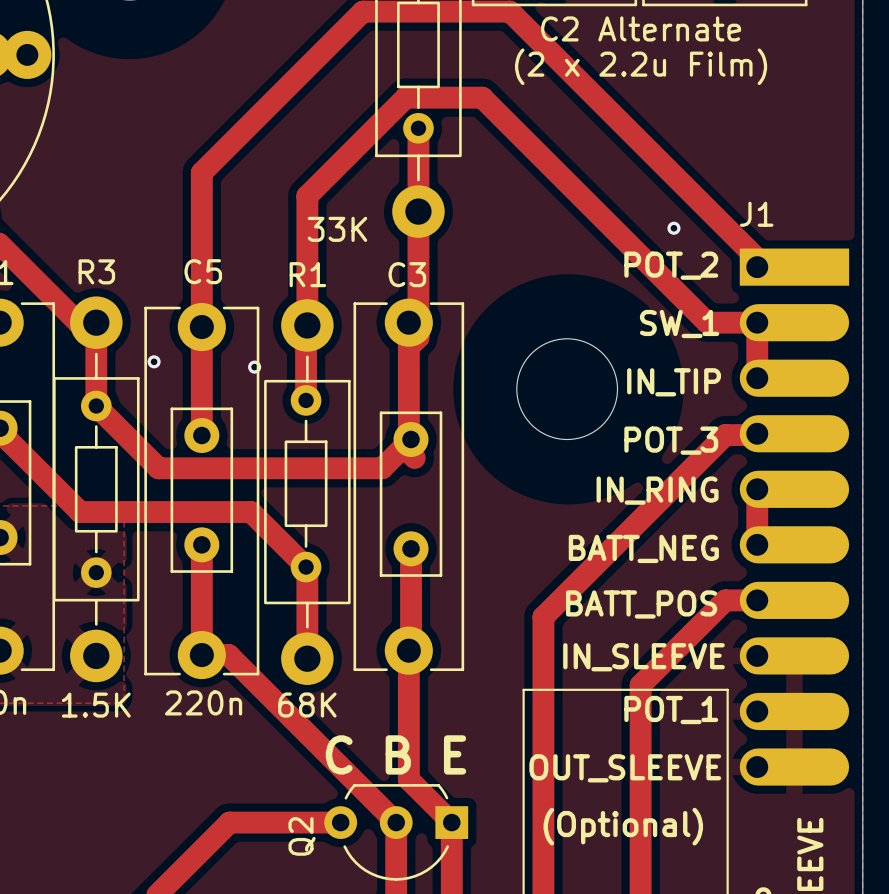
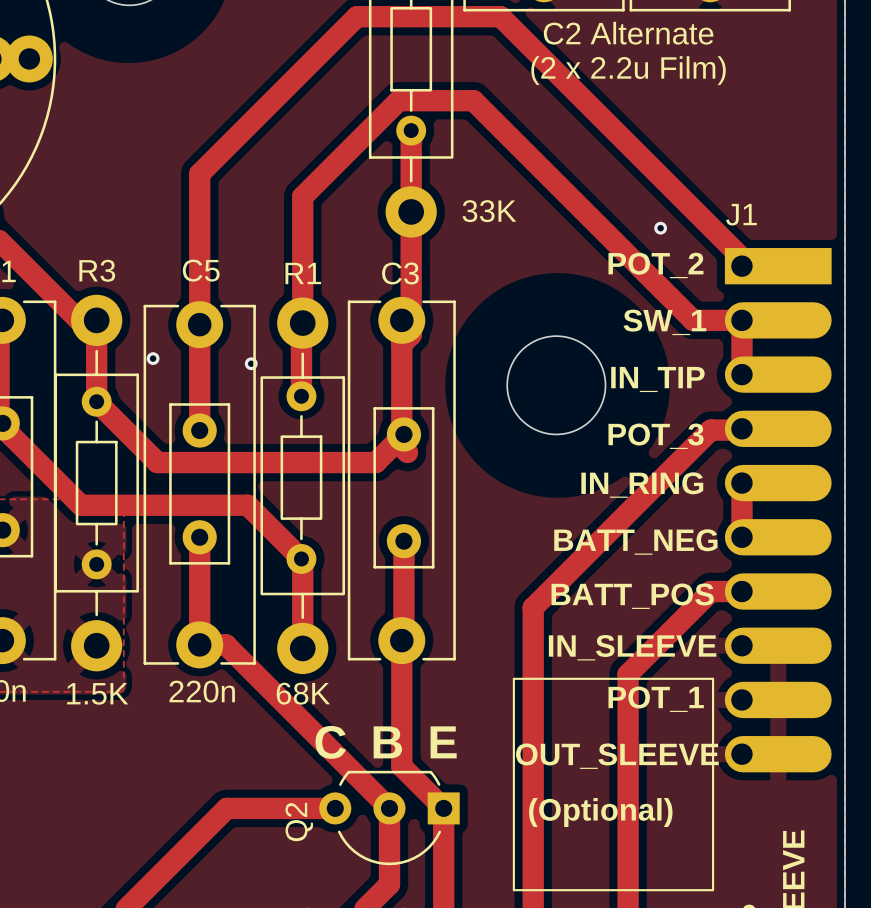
part value position: 33K (337, 229) -> 33K (489, 211)

